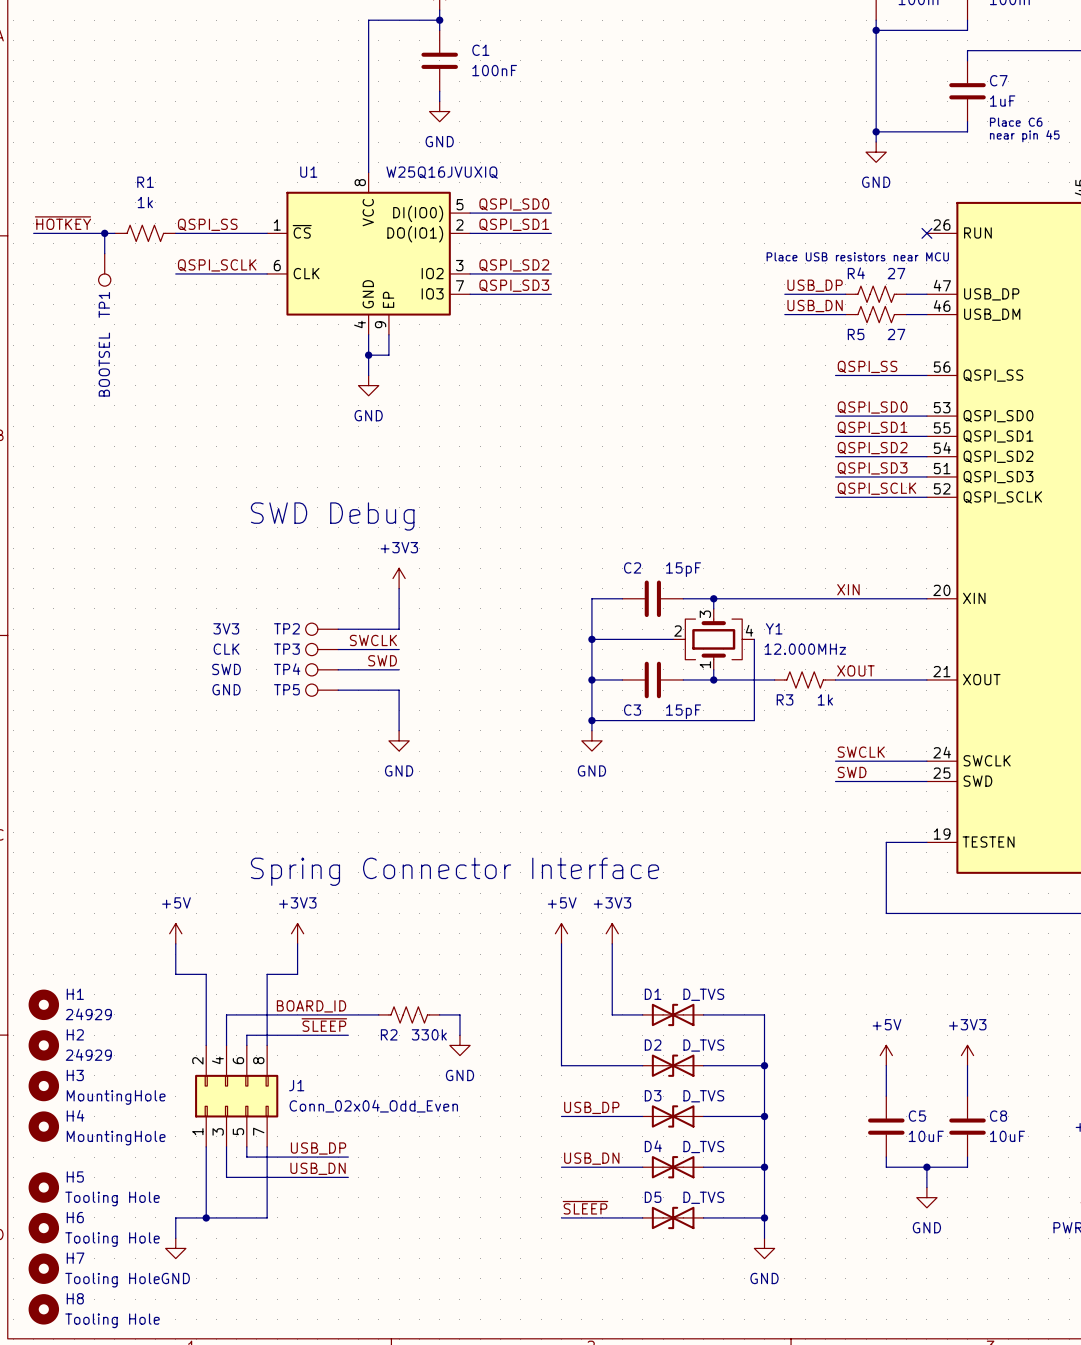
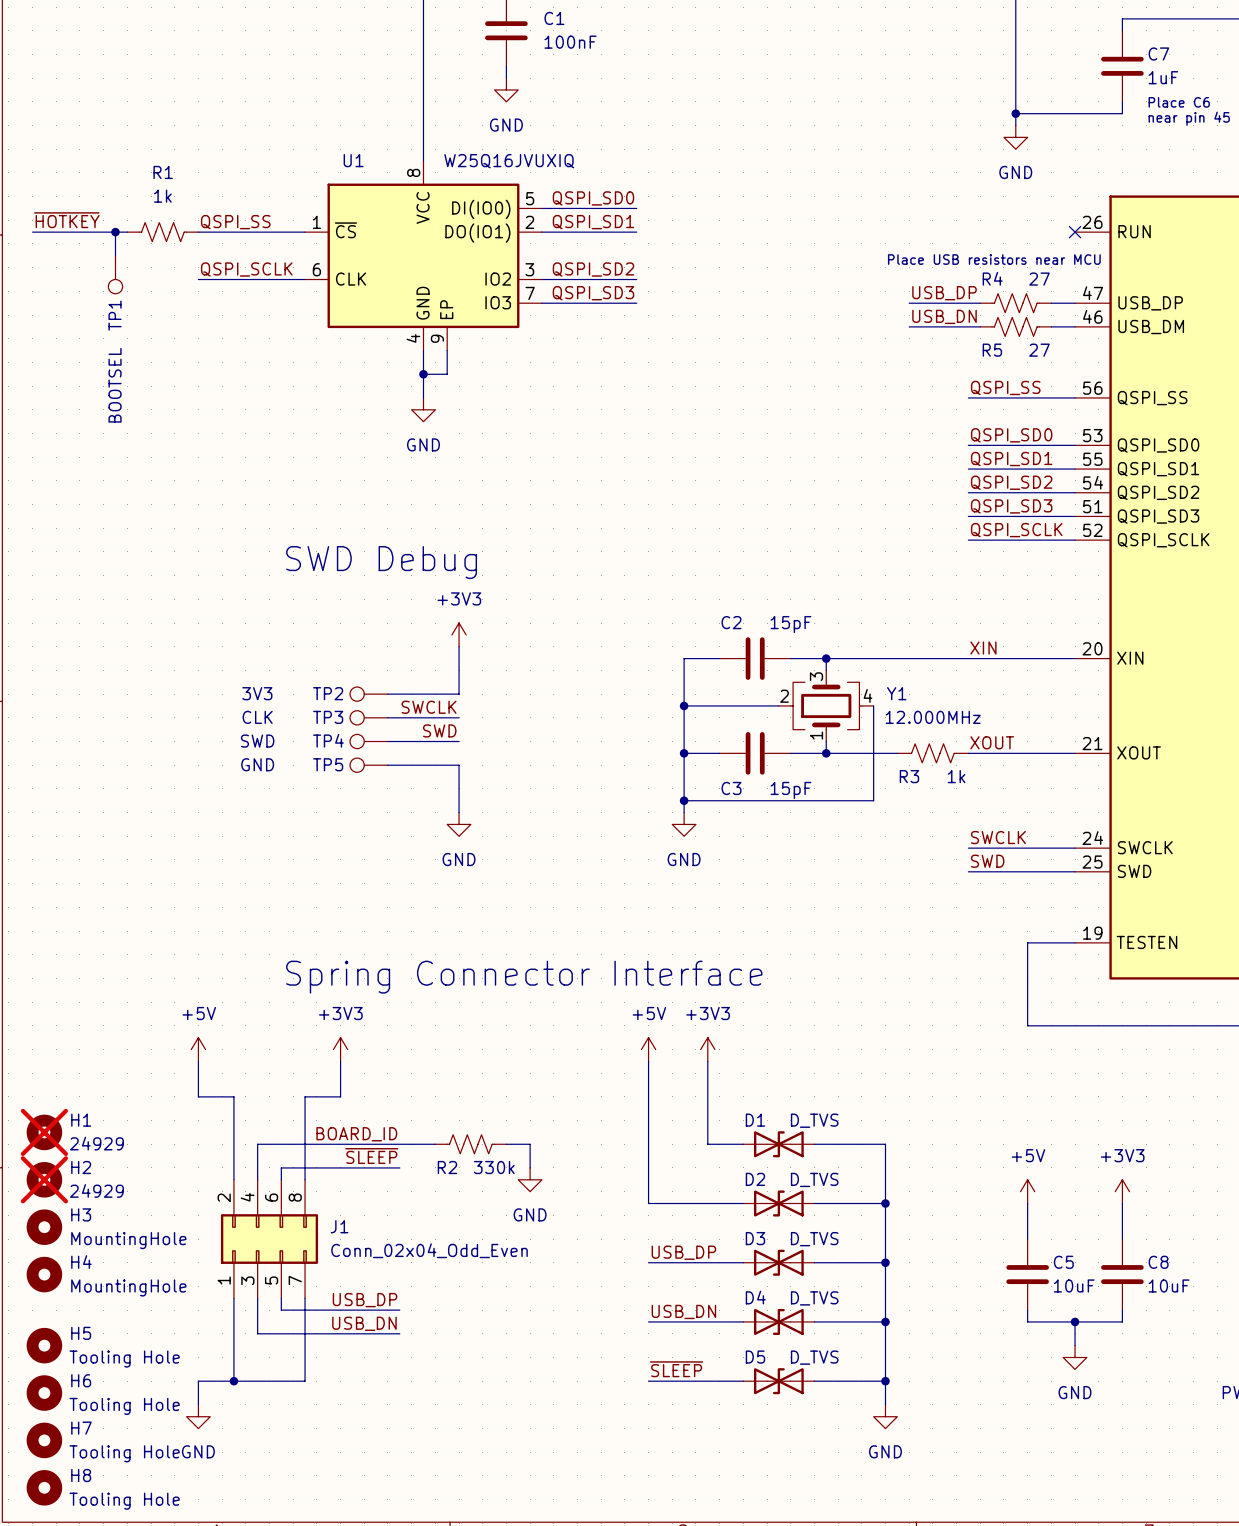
H1 do-not-place cross: none -> (44, 1132)
H2 do-not-place cross: none -> (44, 1179)

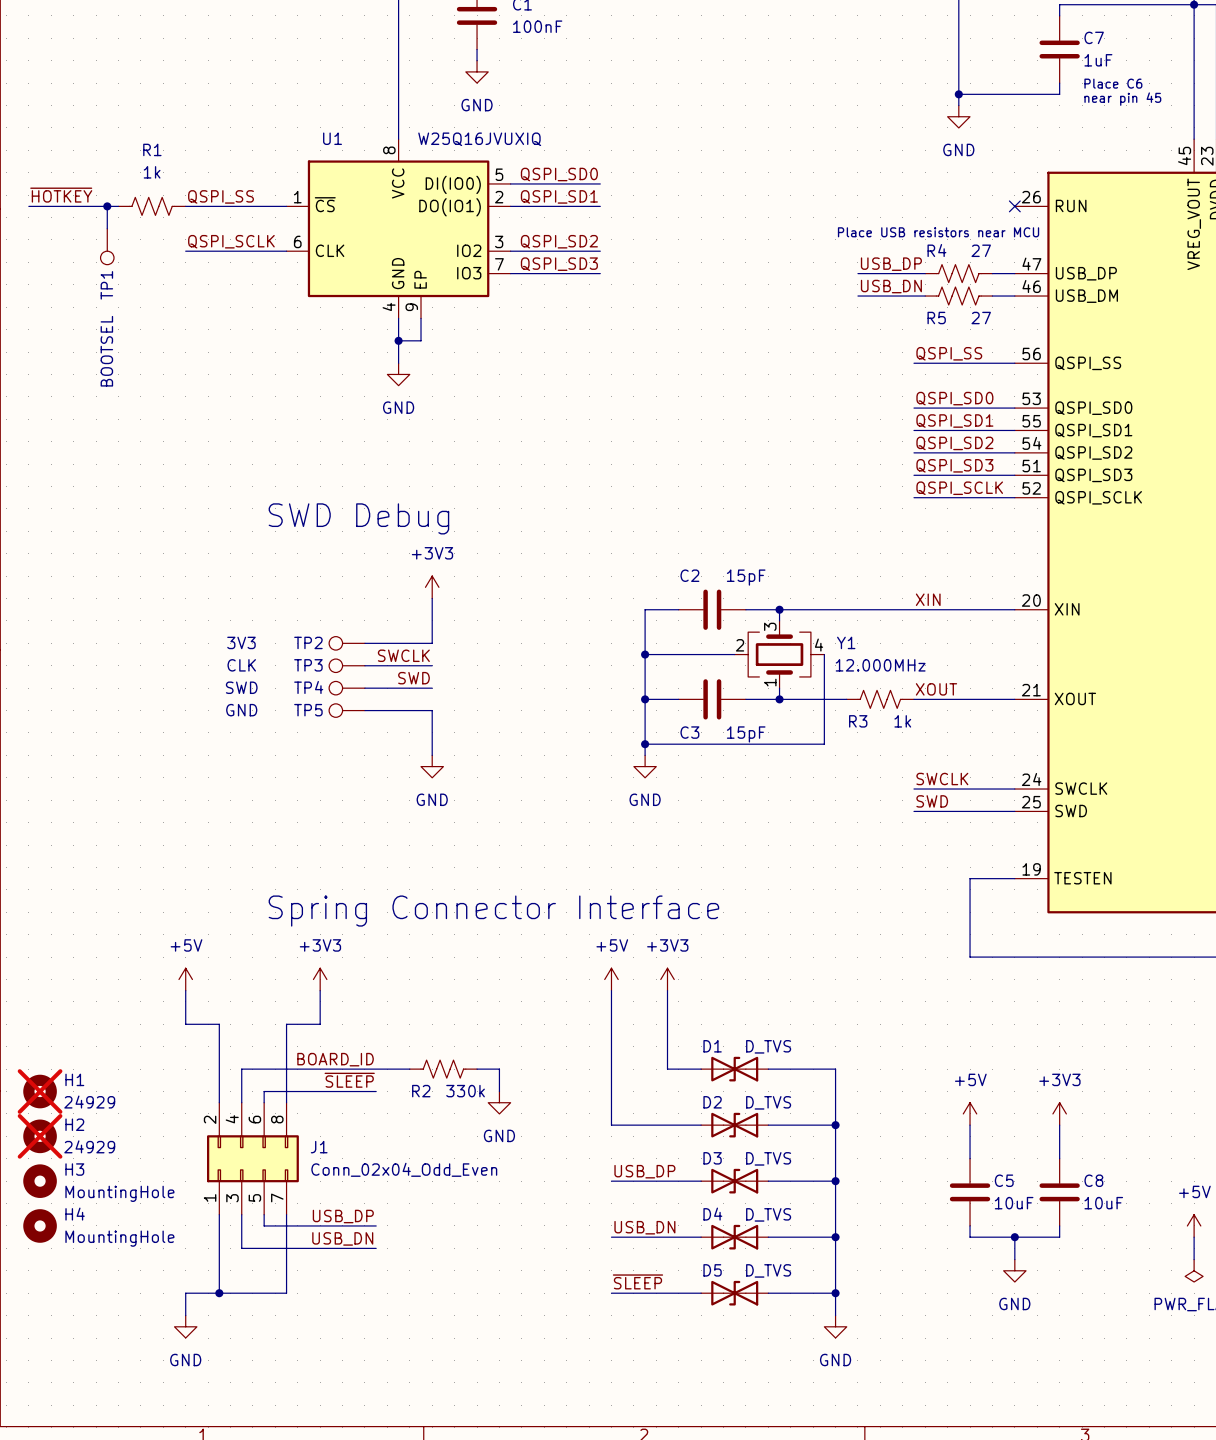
H1 position: (44, 1132) -> (40, 1091)
H2 position: (44, 1179) -> (40, 1136)
H3 position: (44, 1227) -> (40, 1181)
H4 position: (44, 1274) -> (40, 1225)
H5: Tooling Hole (44, 1345) -> none
H6: Tooling Hole (44, 1393) -> none
H7: Tooling Hole (44, 1440) -> none
H8: Tooling Hole (44, 1487) -> none

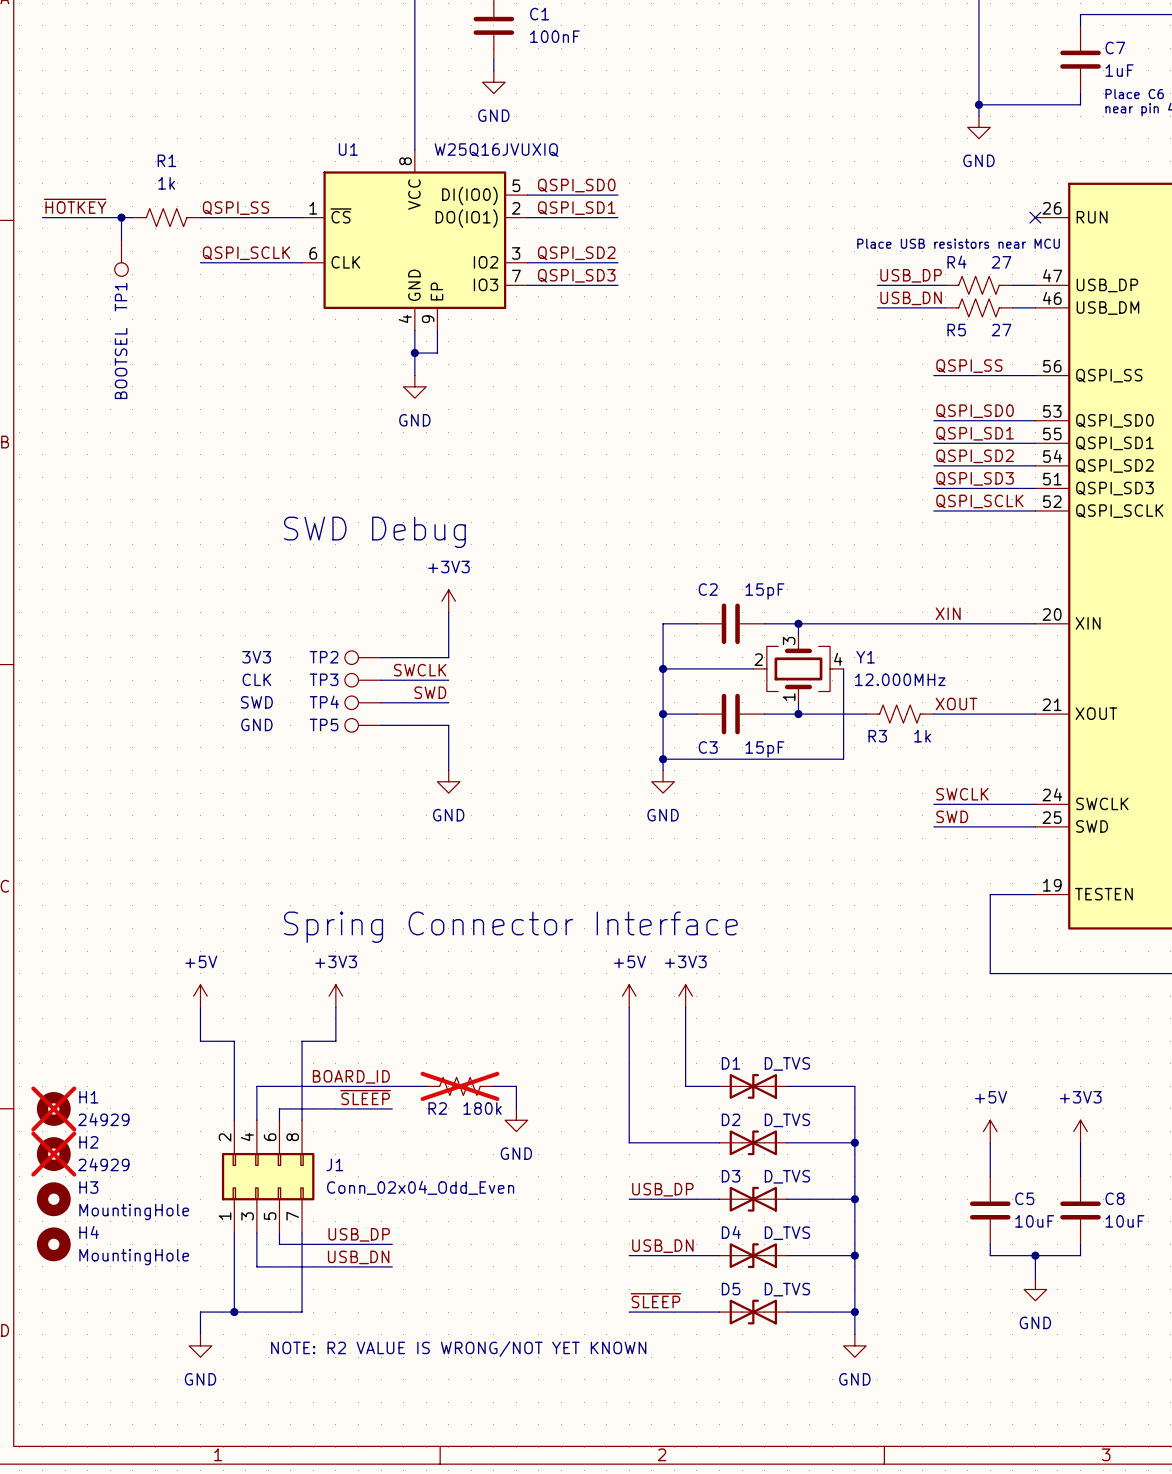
R2 do-not-place cross: none -> (459, 1086)
R2 value: 330k (465, 1091) -> 180k (482, 1108)
text: none -> NOTE: R2 VALUE IS WRONG/NOT YET KNOWN (458, 1349)

